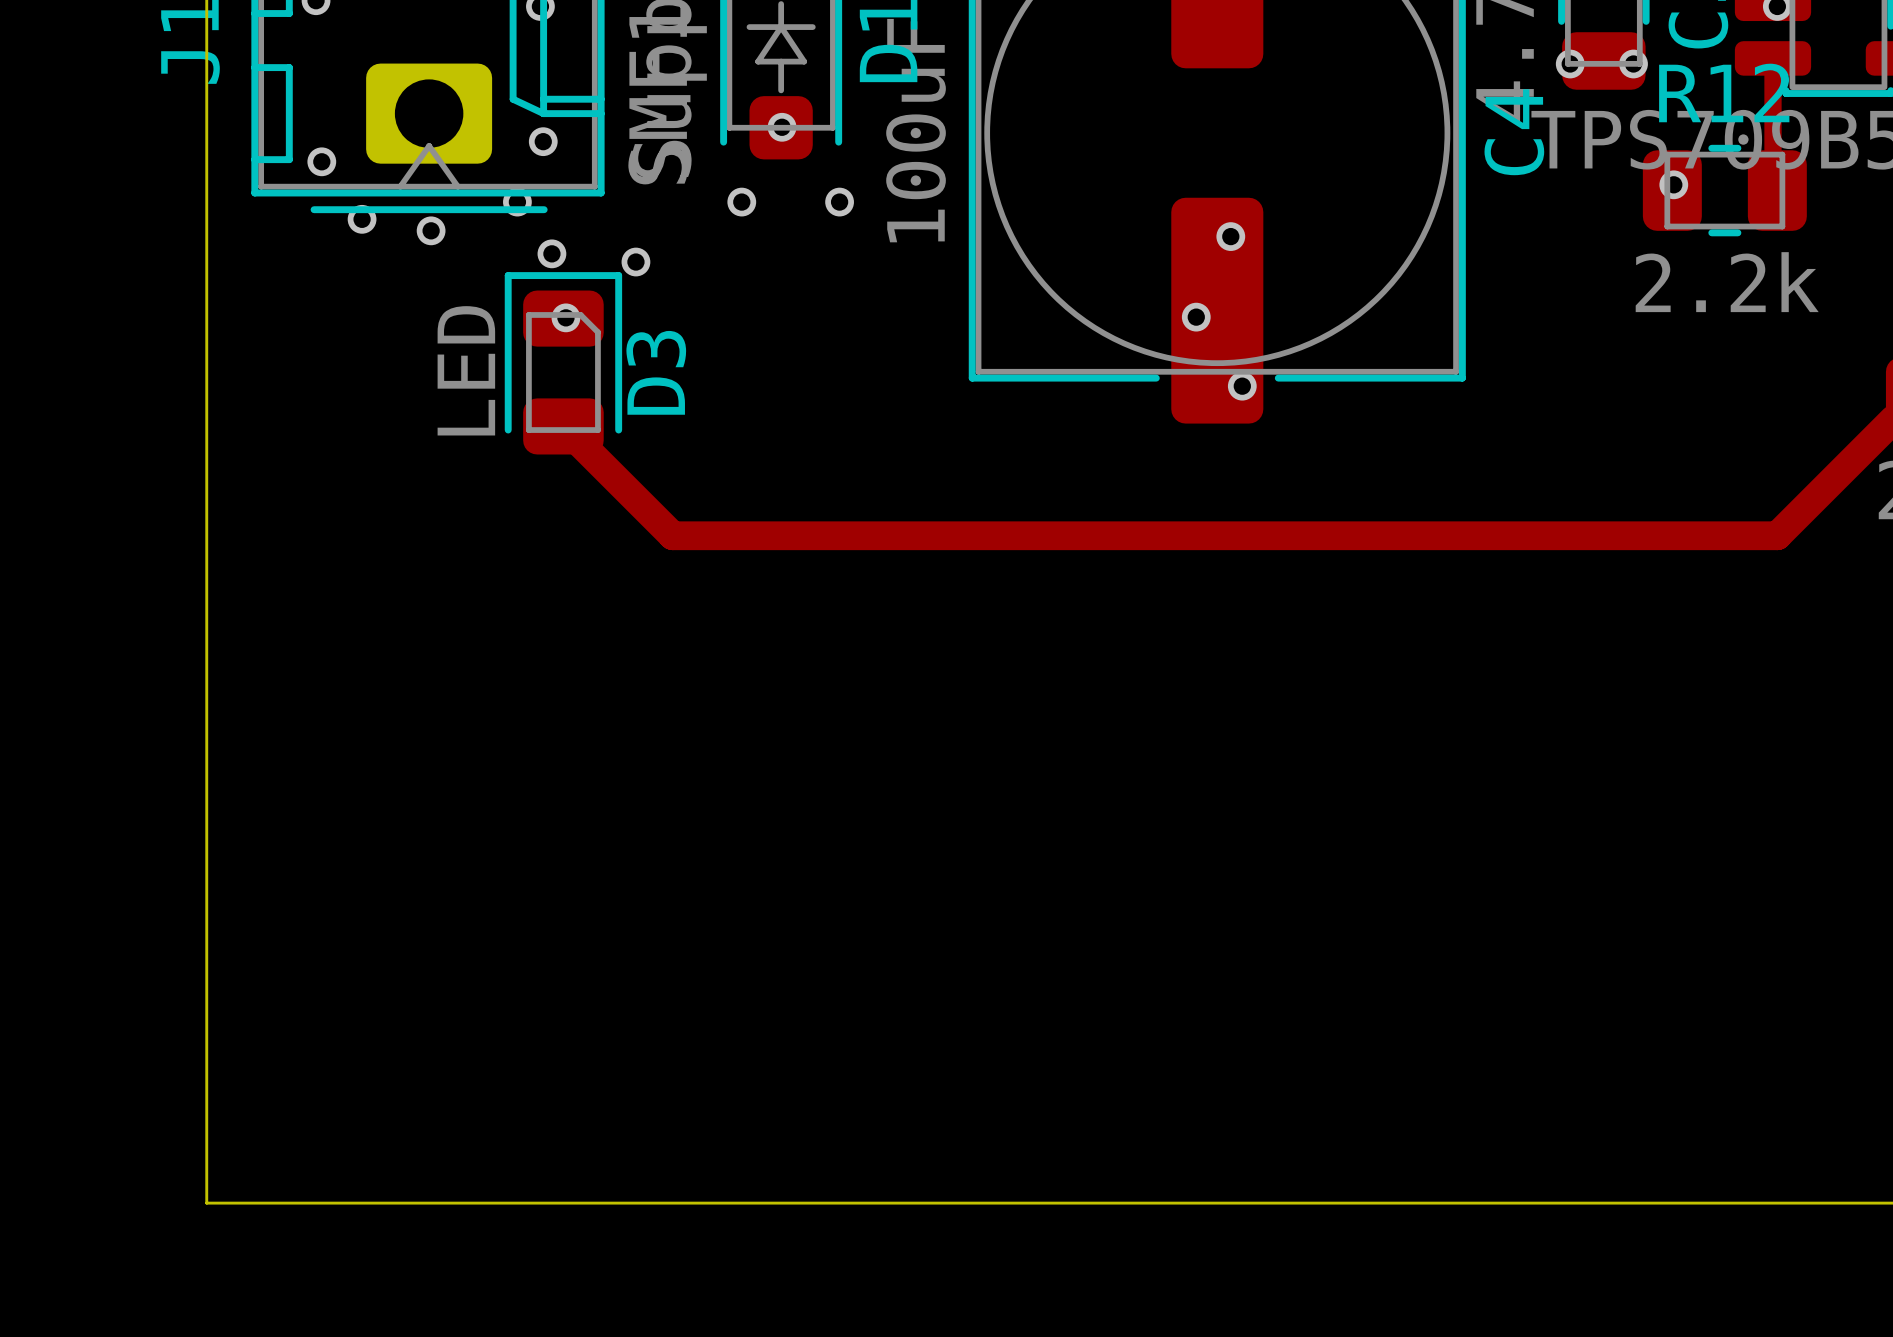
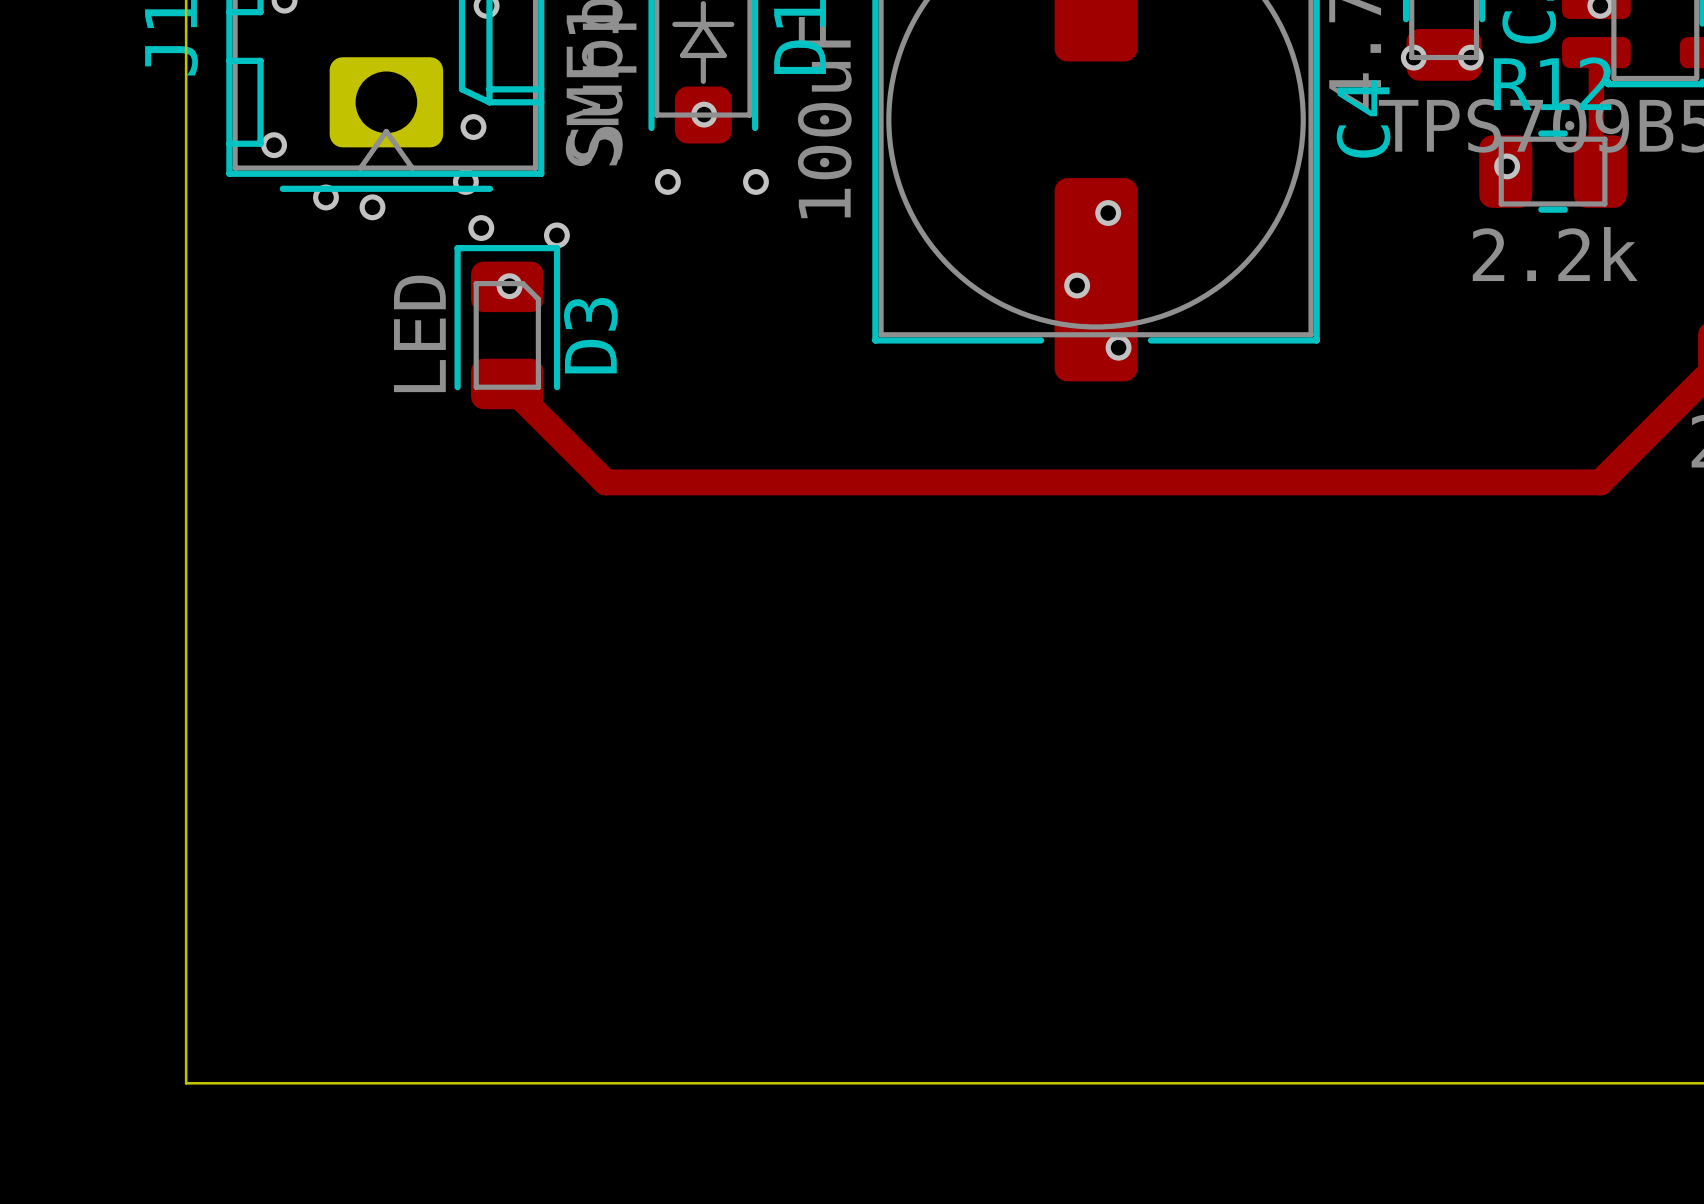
via position: (543, 141) -> (473, 127)
via position: (321, 161) -> (274, 145)
via position: (431, 230) -> (372, 207)
via position: (551, 253) -> (481, 228)
via position: (635, 262) -> (556, 235)

